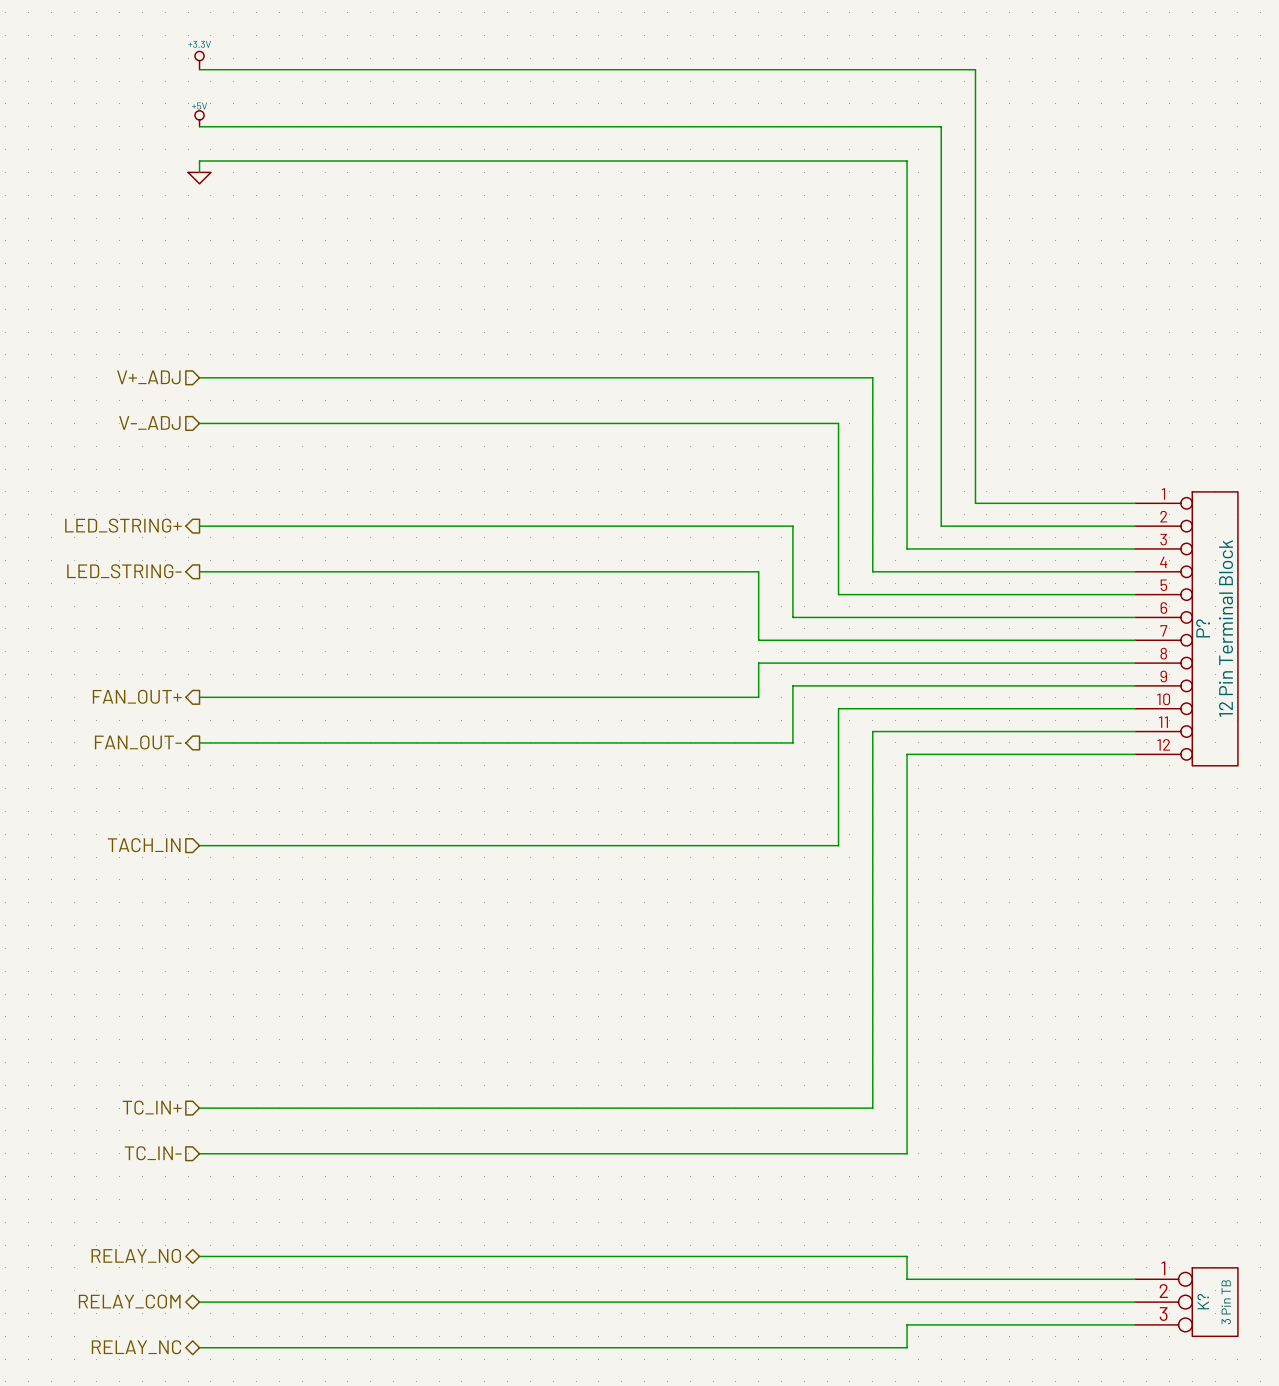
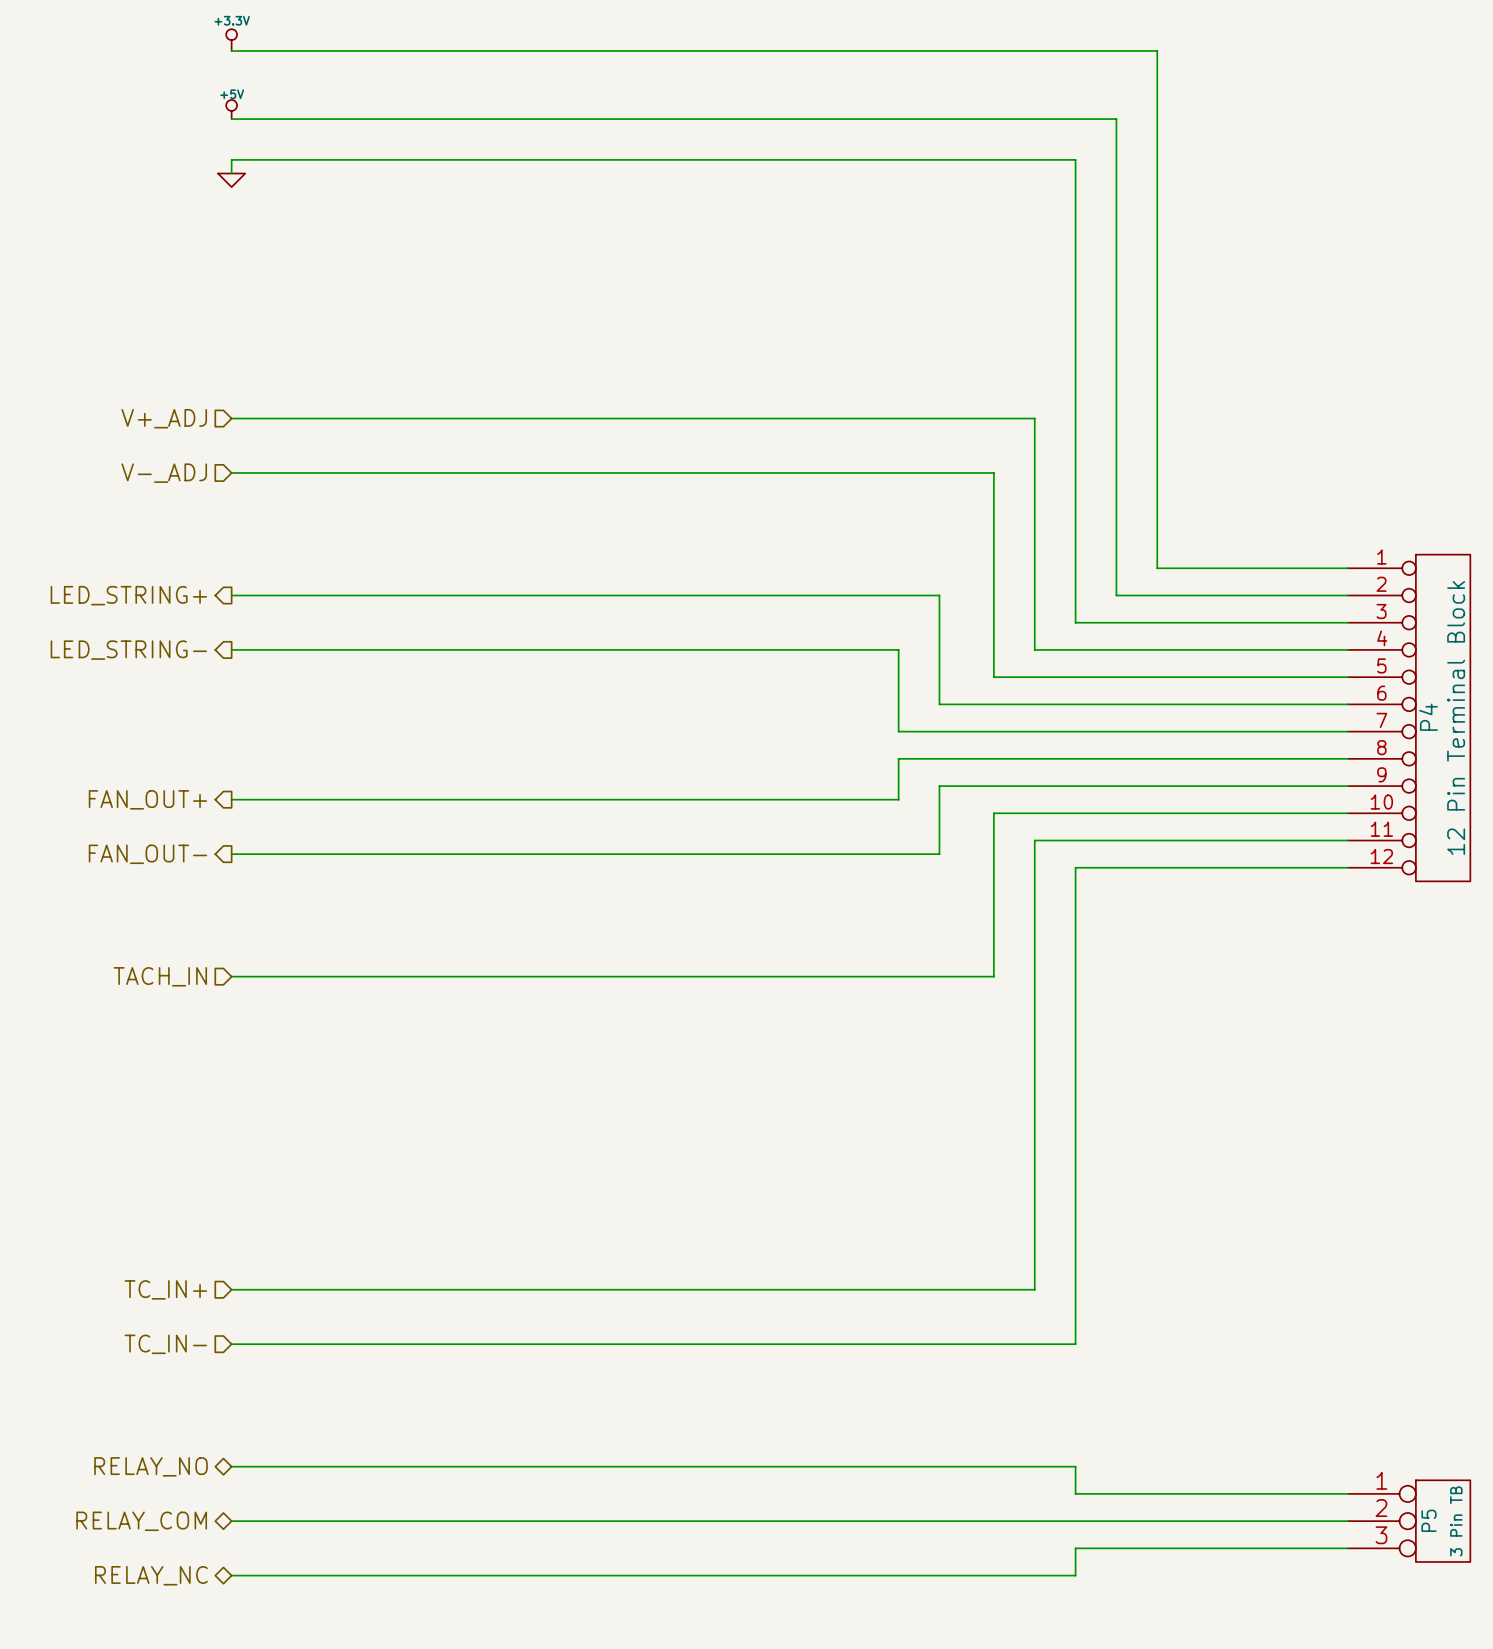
P? name: P? (1203, 628) -> P4 (1428, 717)
K? name: K? (1203, 1301) -> P5 (1429, 1520)

